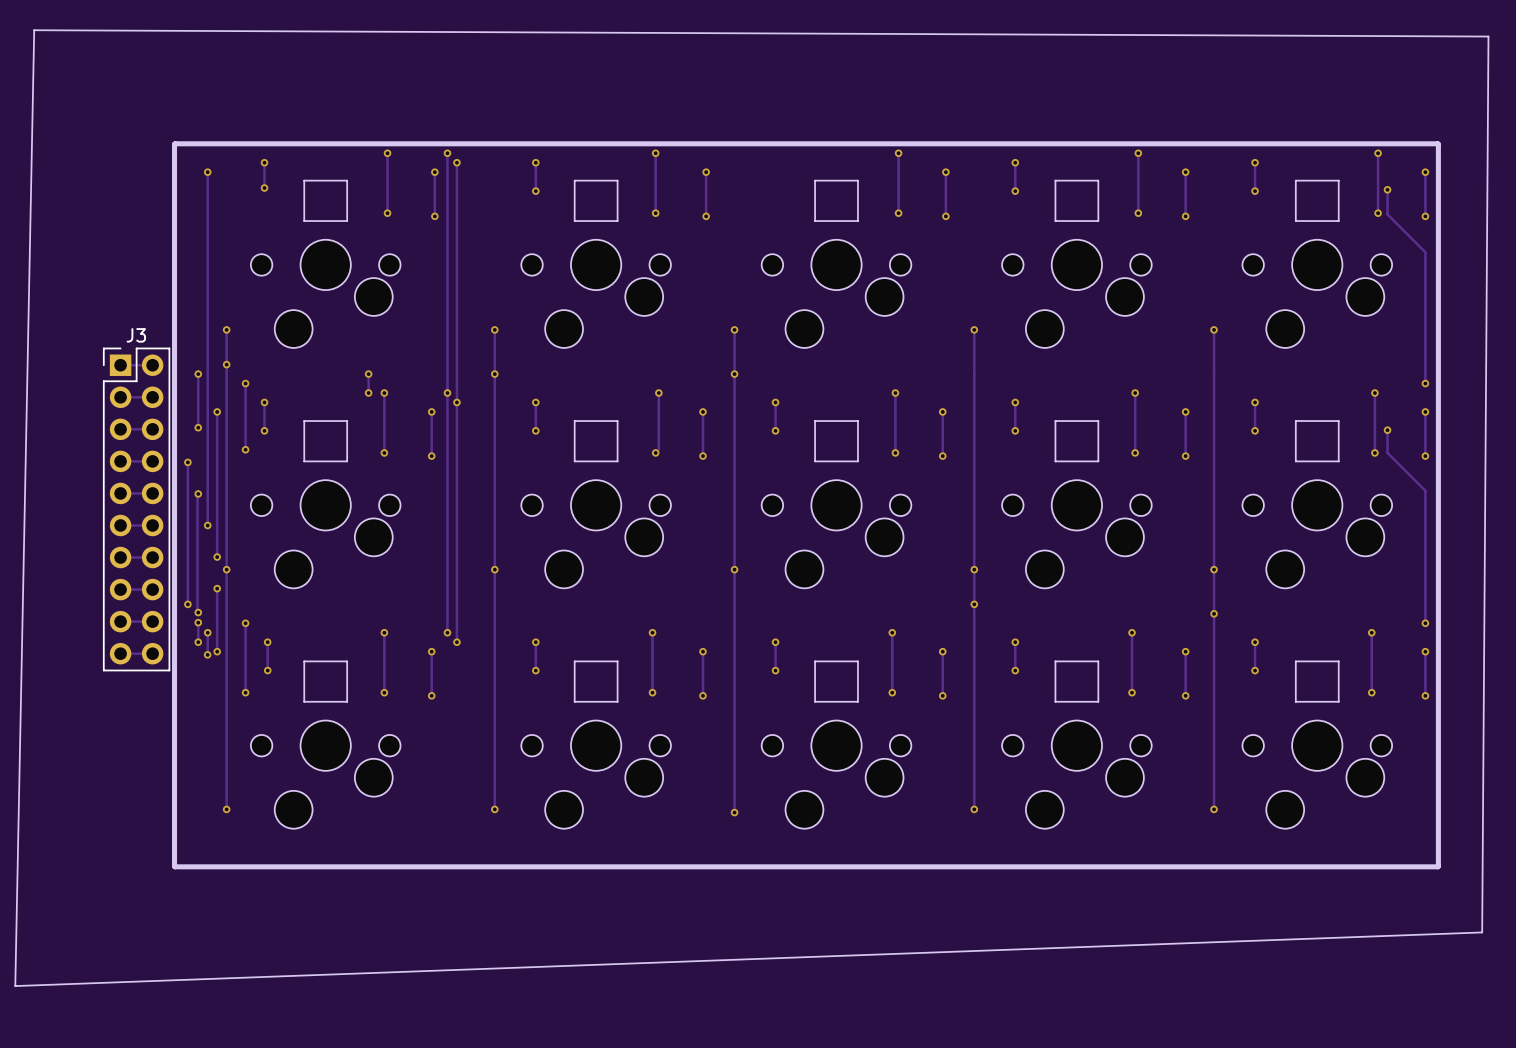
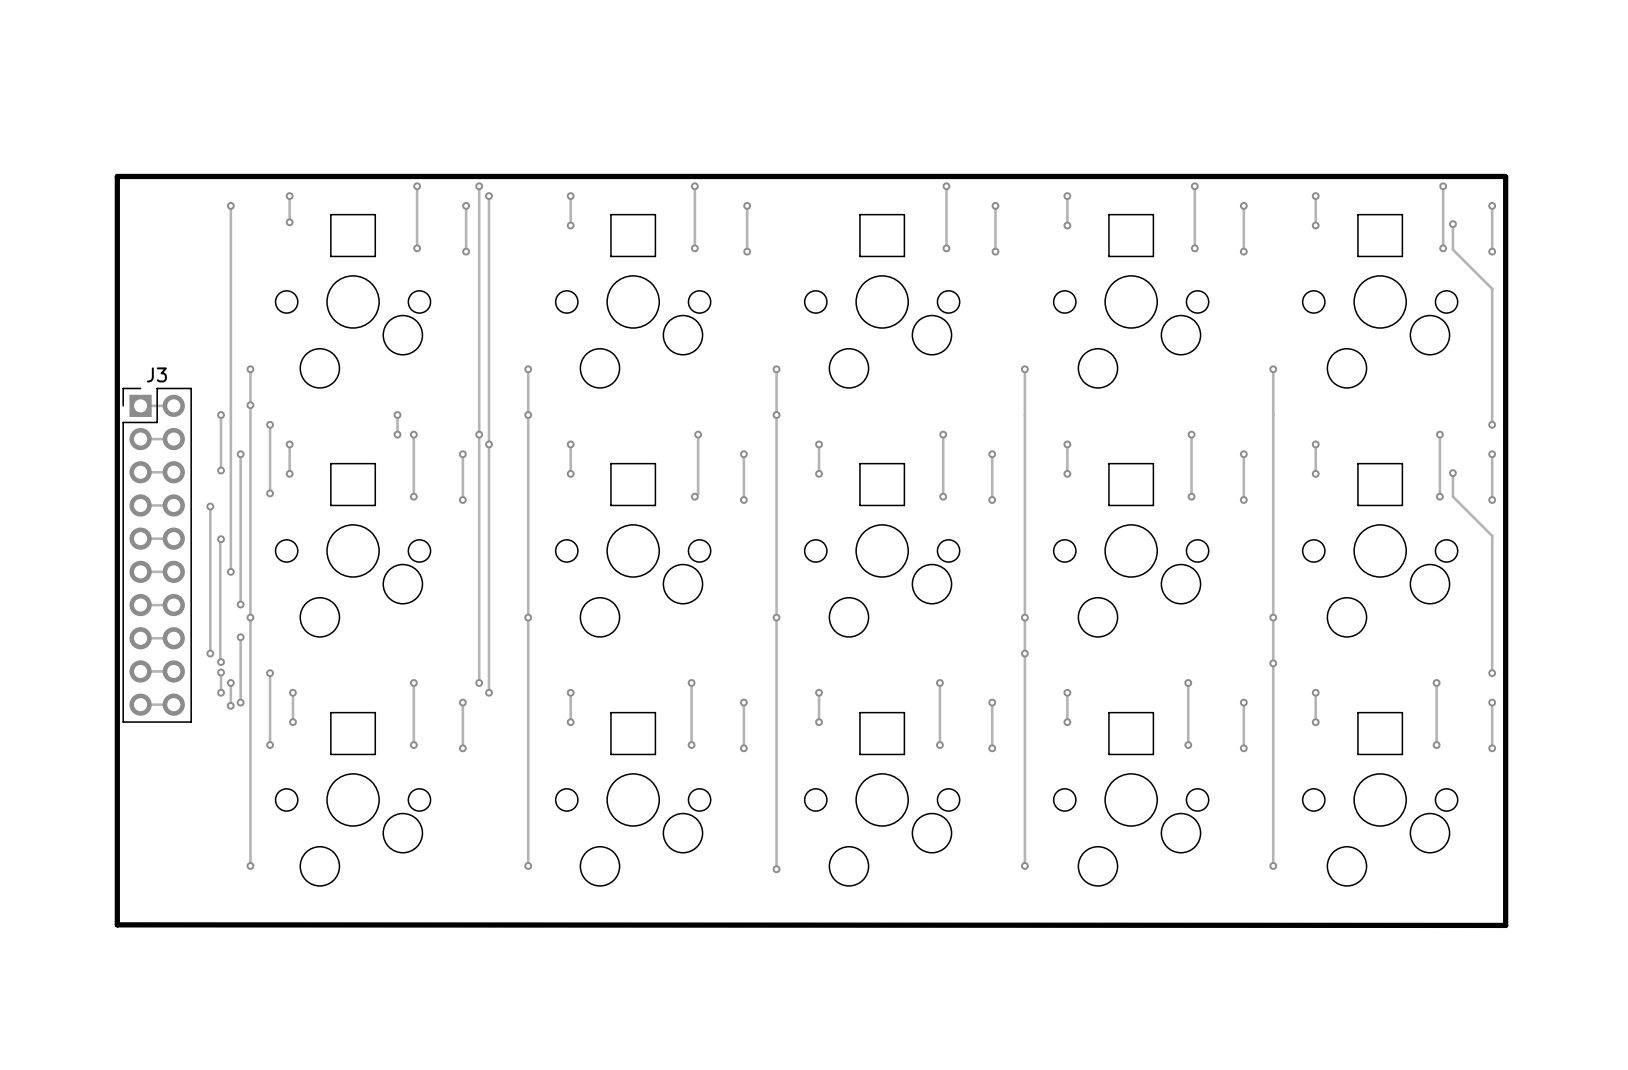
board edge: (34, 30) (15, 986) (1482, 932) (1488, 36) (34, 30) -> none
board edge: (175, 143) (175, 866) (1438, 866) -> (197, 176) (117, 176) (117, 924) (1505, 924)

